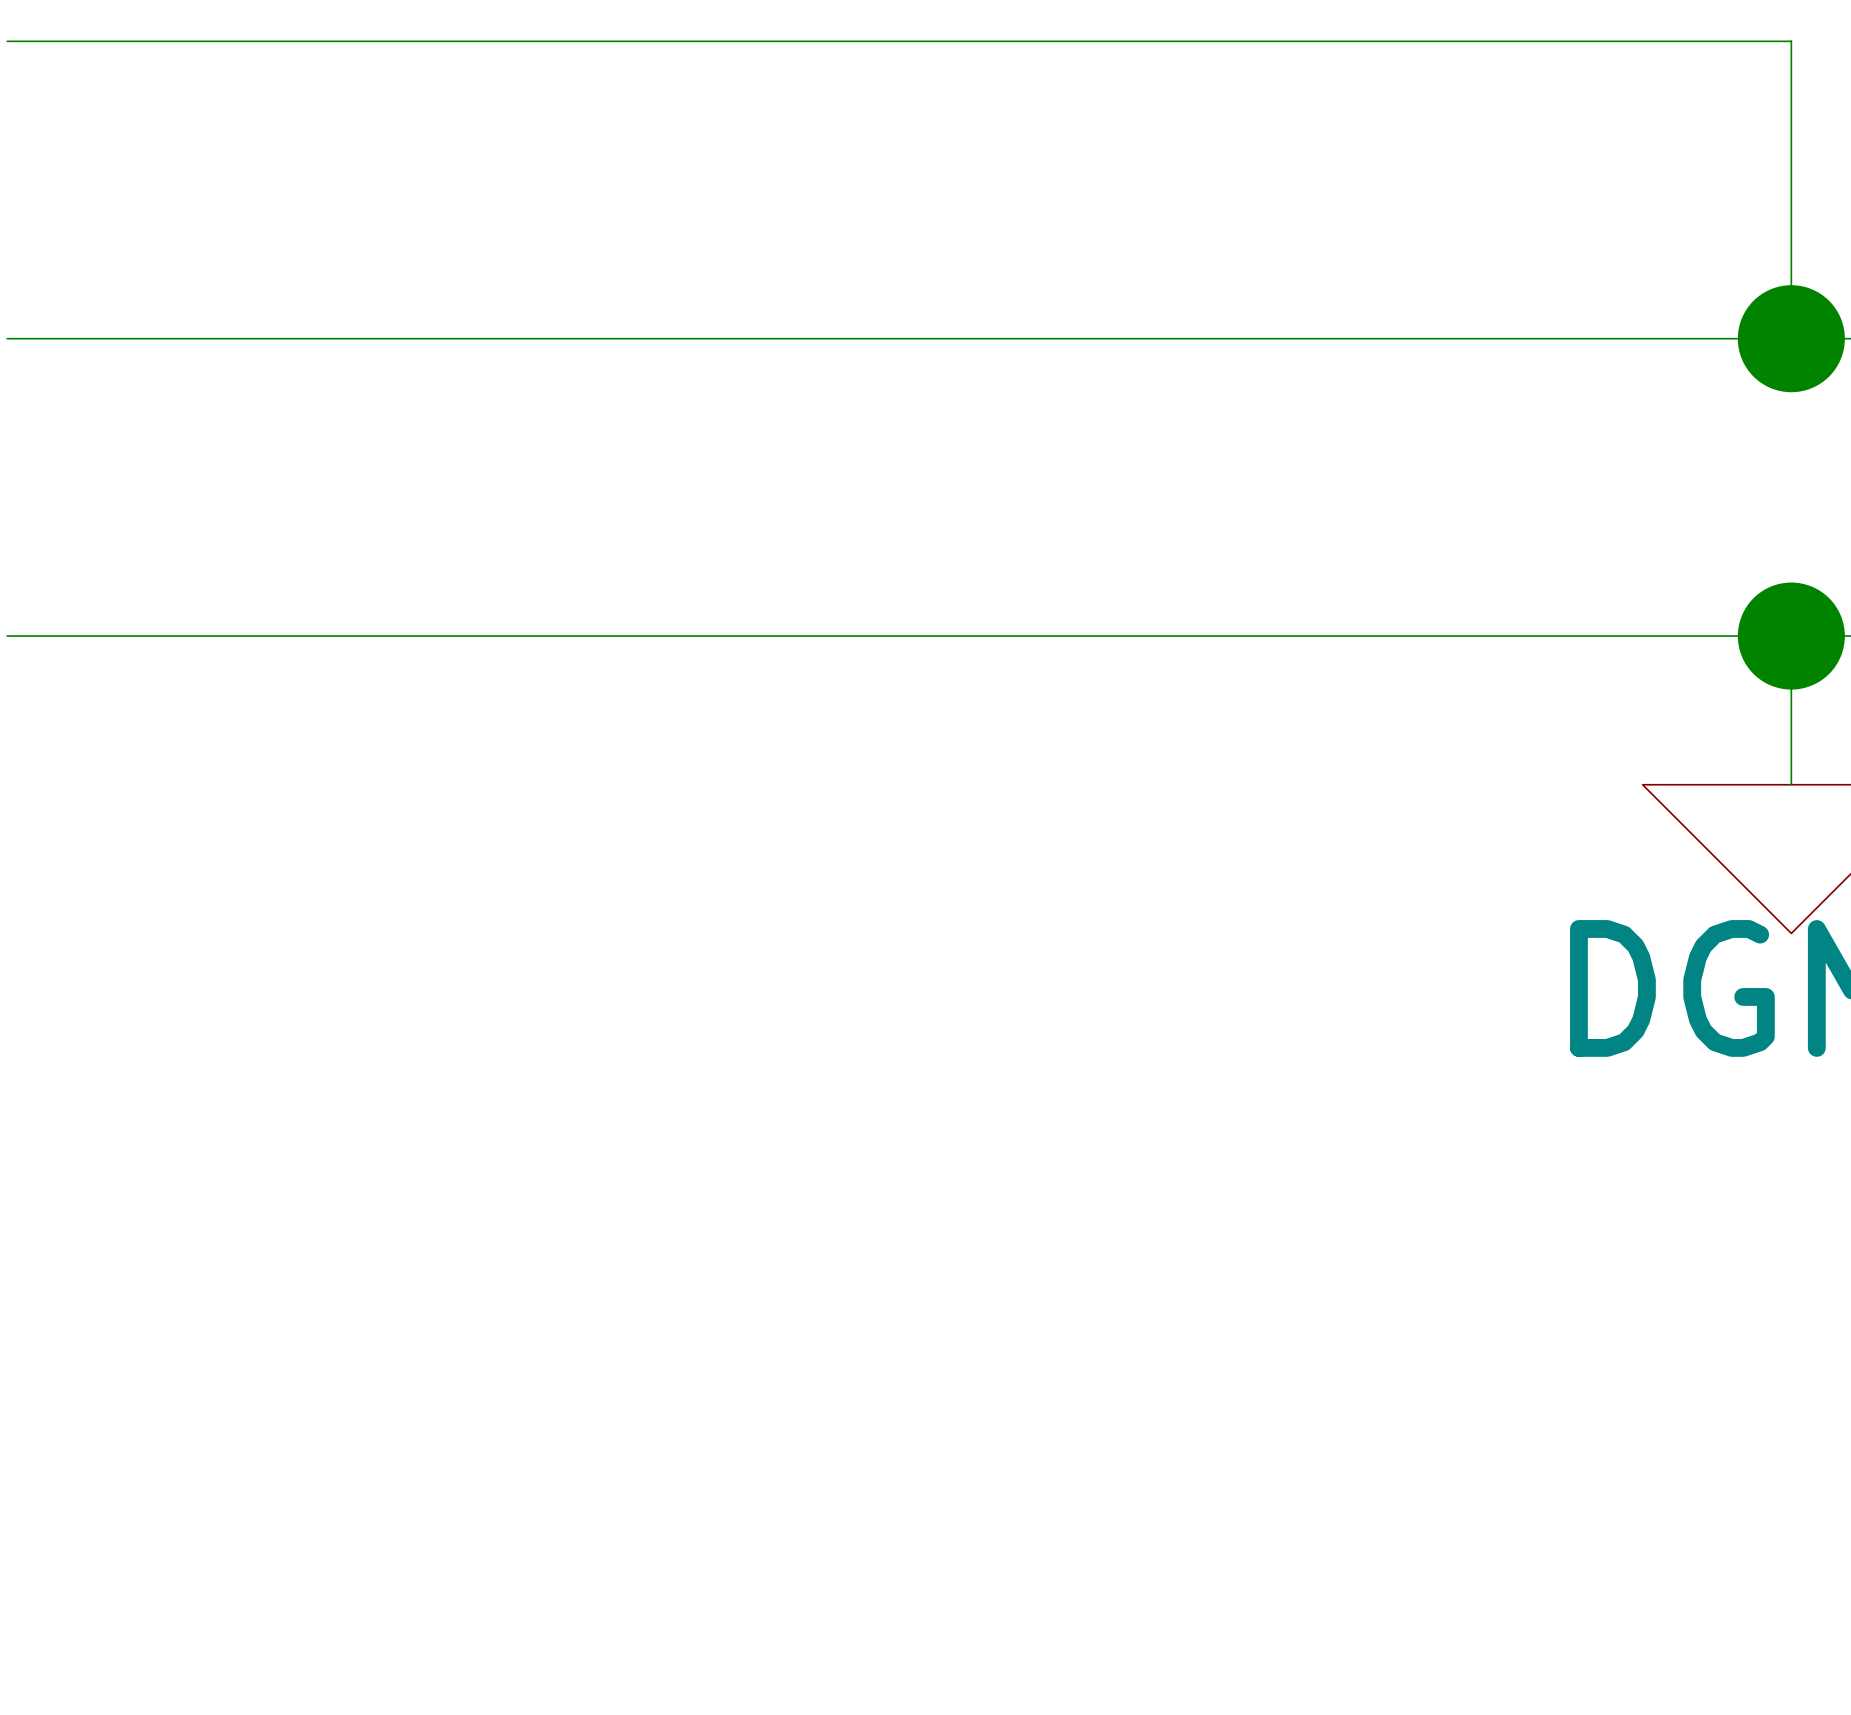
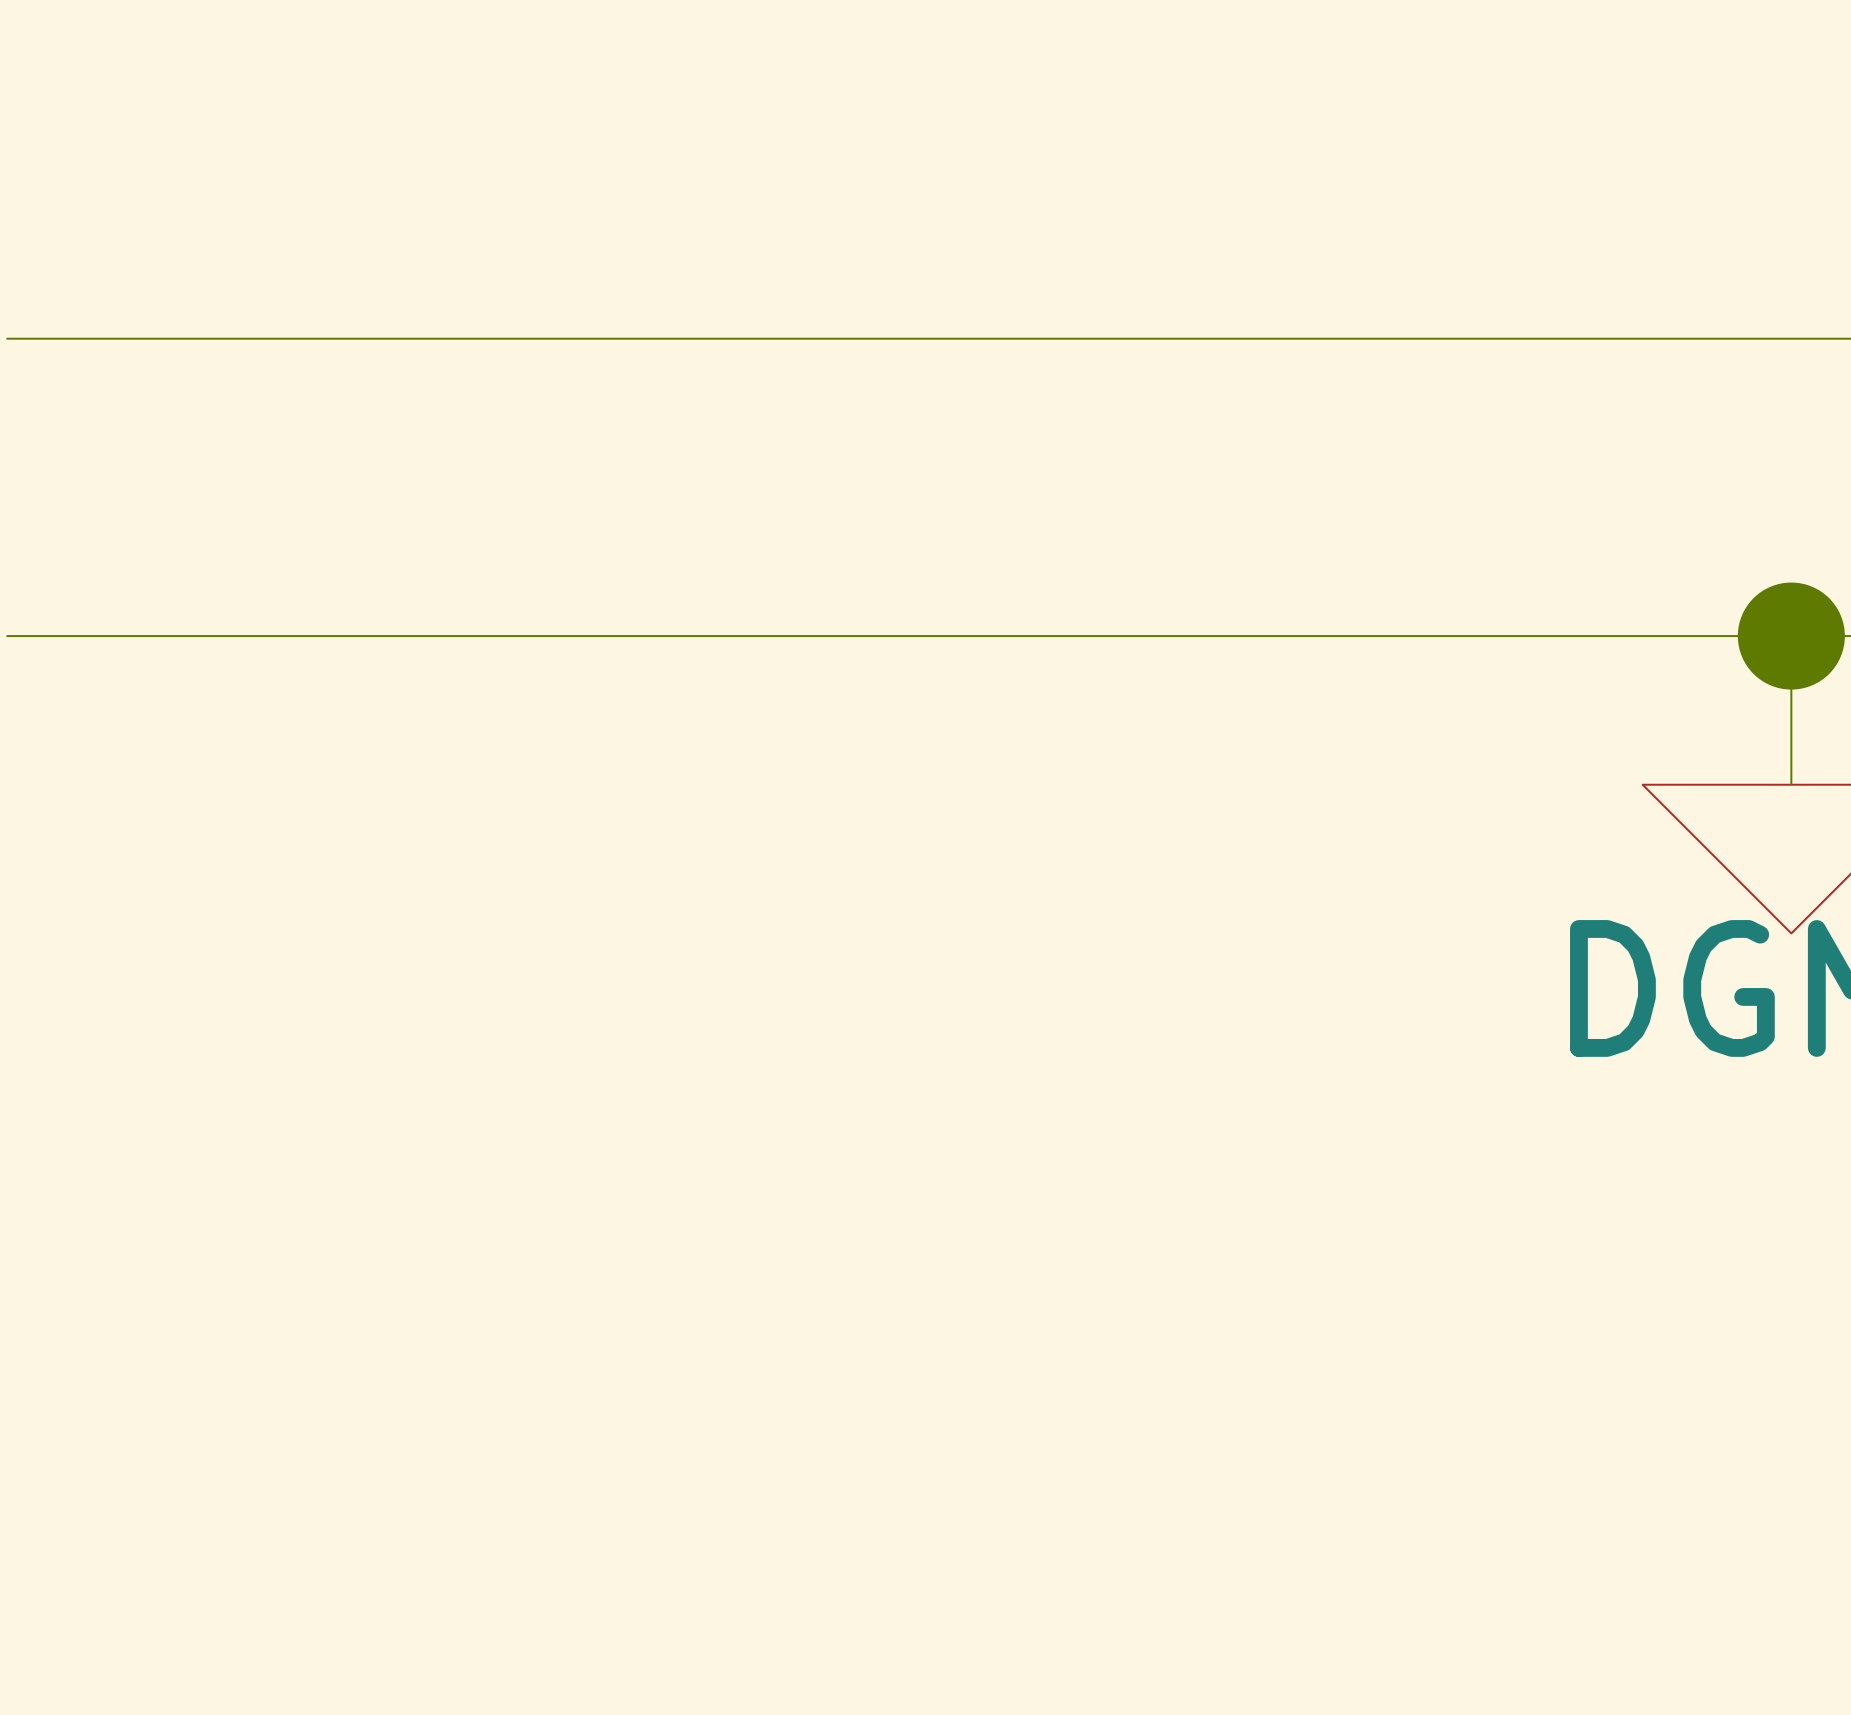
wire: (7, 41) (1791, 41) (1791, 338) -> none
junction: (1791, 338) -> none

